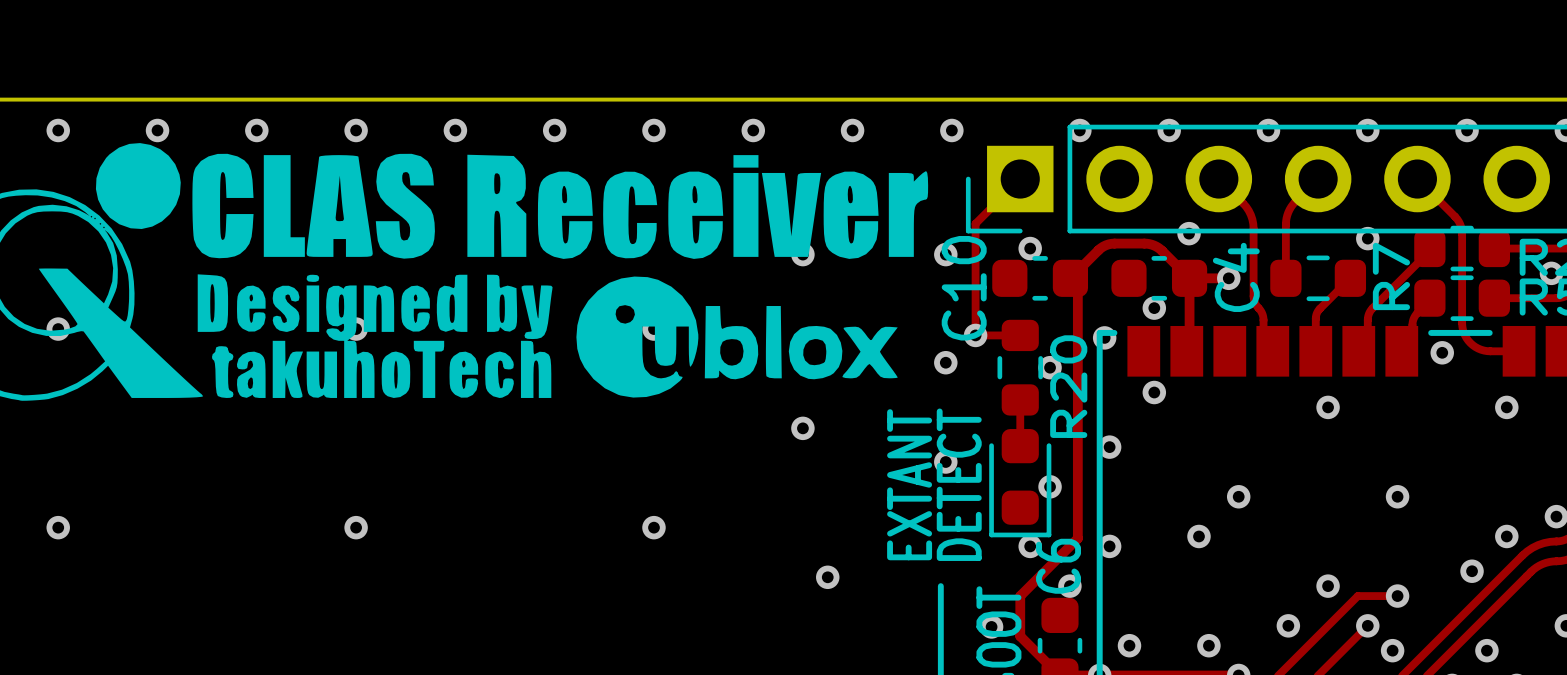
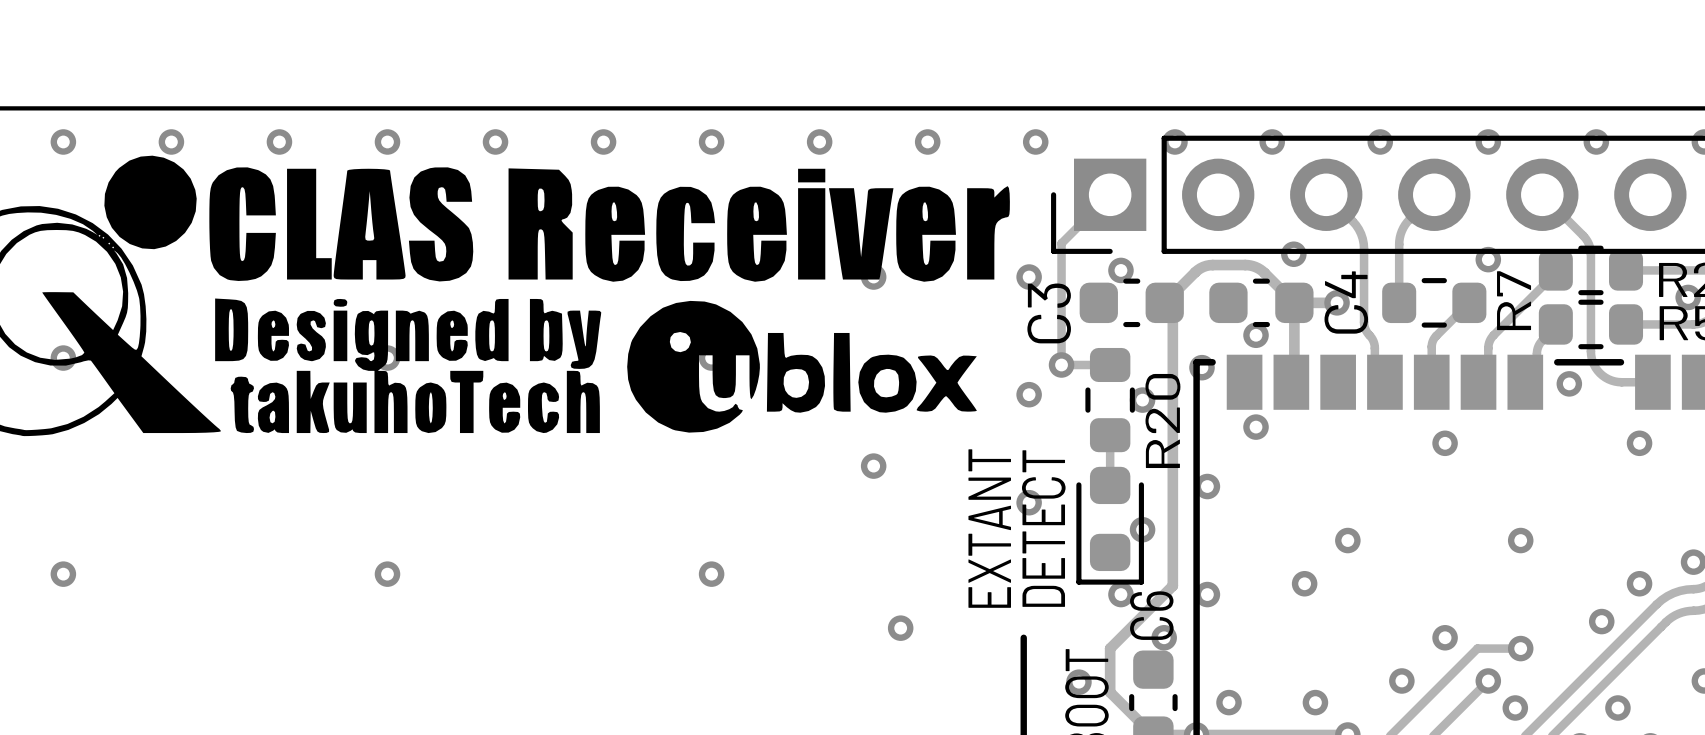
C10 name: C10 (964, 288) -> C3 (1049, 313)

